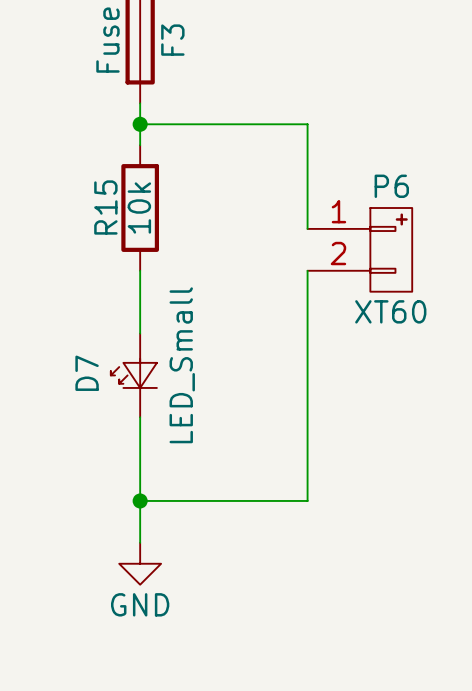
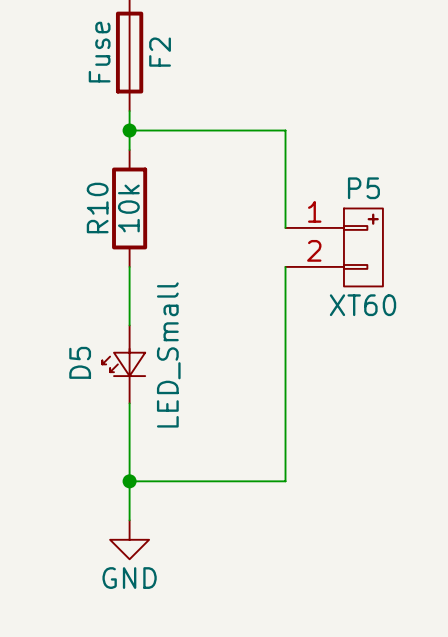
F3 name: F3 (172, 40) -> F2 (160, 52)
P6 name: P6 (391, 186) -> P5 (363, 188)
R15 name: R15 (105, 207) -> R10 (97, 208)
D7 name: D7 (87, 373) -> D5 (80, 362)

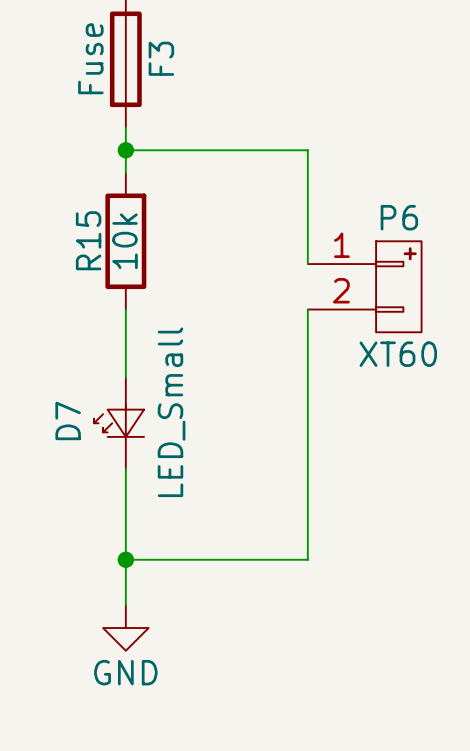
F2 name: F2 (160, 52) -> F3 (161, 58)
P5 name: P5 (363, 188) -> P6 (399, 217)
R10 name: R10 (97, 208) -> R15 (88, 240)
D5 name: D5 (80, 362) -> D7 (68, 420)

